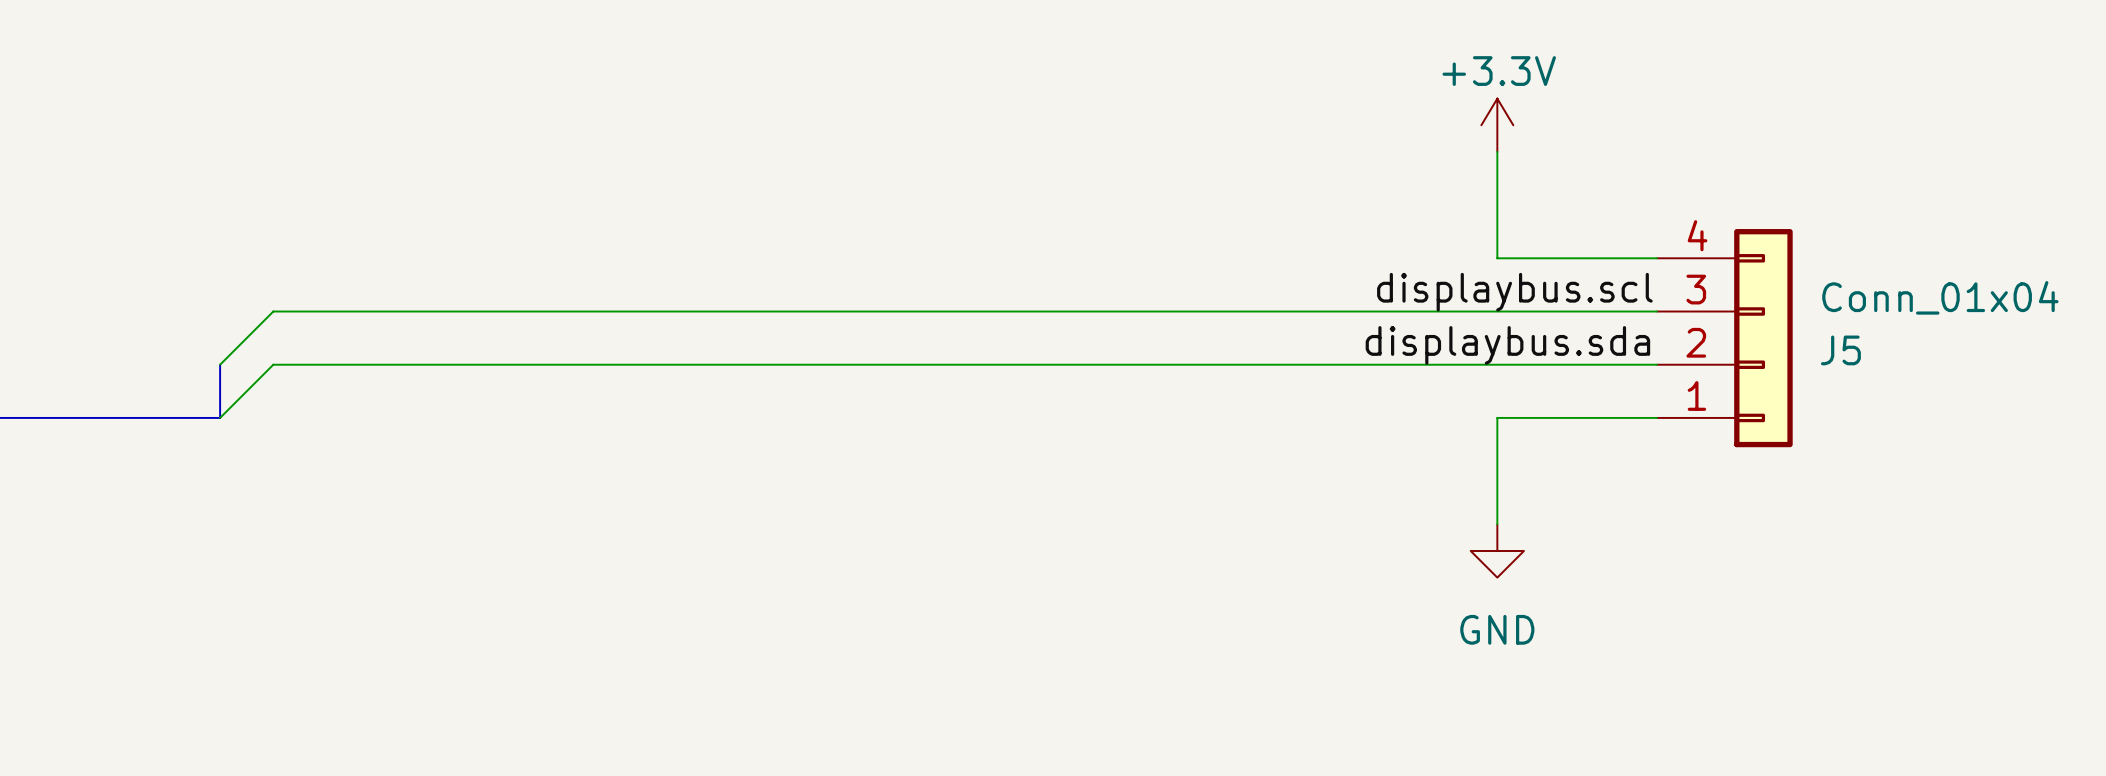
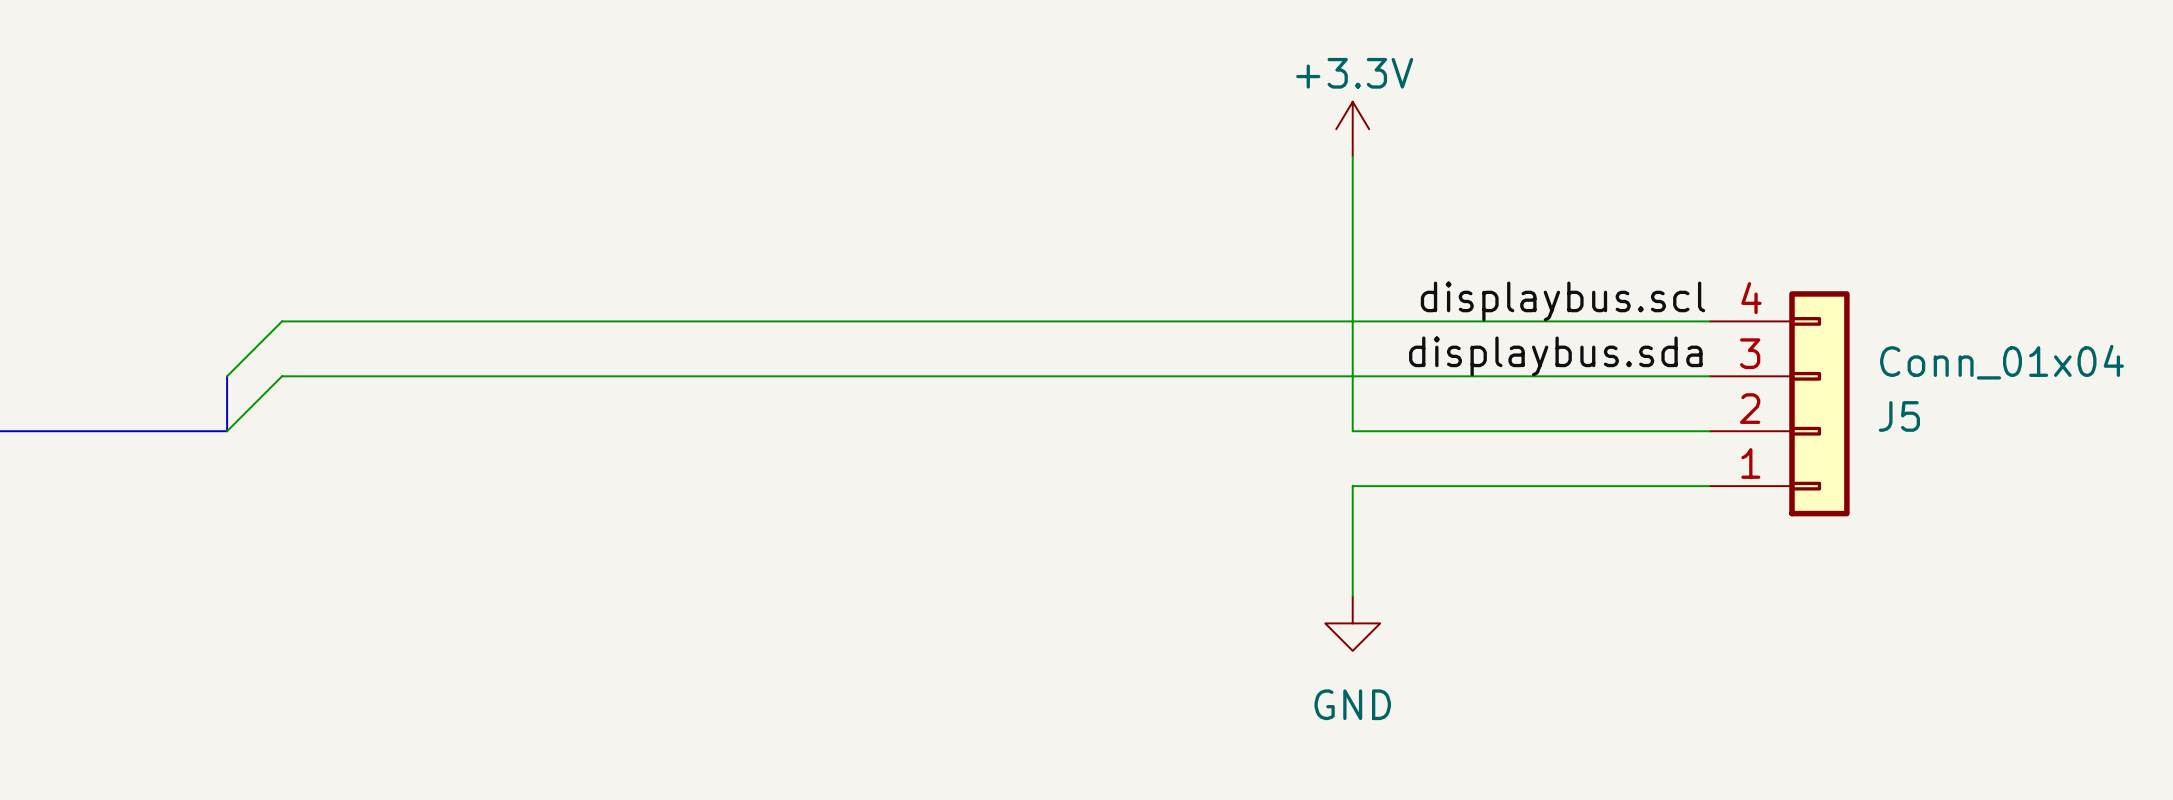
power symbol position: +3.3V (1497, 125) -> +3.3V (1352, 129)
wire: (1497, 151) (1497, 258) (1656, 258) -> none
J5 position: (1724, 338) -> (1779, 403)
wire: (1497, 417) (1497, 524) -> (1544, 431) (1352, 431) (1352, 156)
wire: none -> (1709, 486) (1352, 486) (1352, 595)
power symbol position: GND (1497, 550) -> GND (1352, 623)

